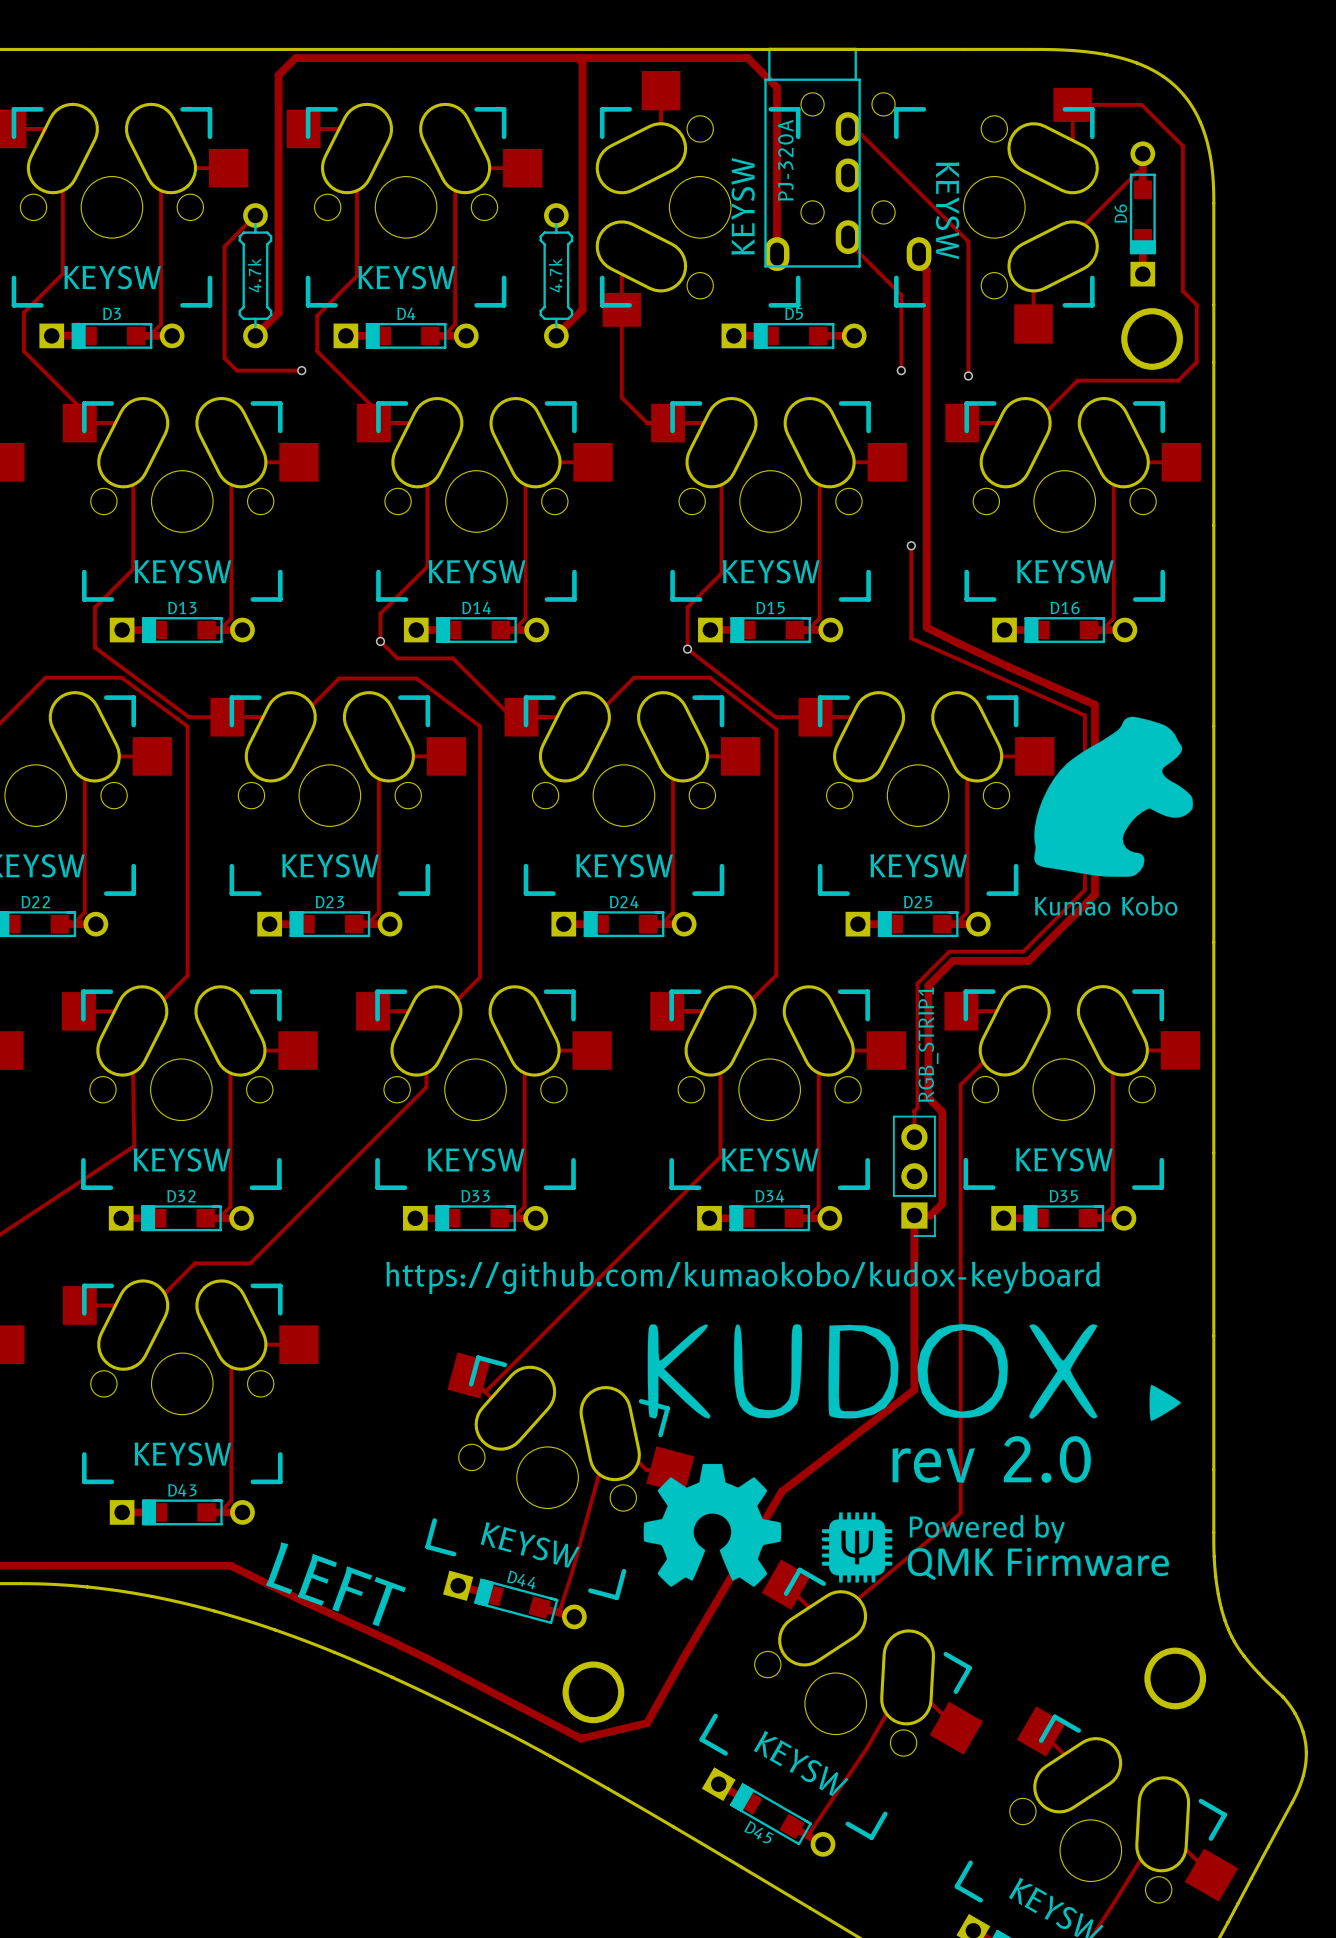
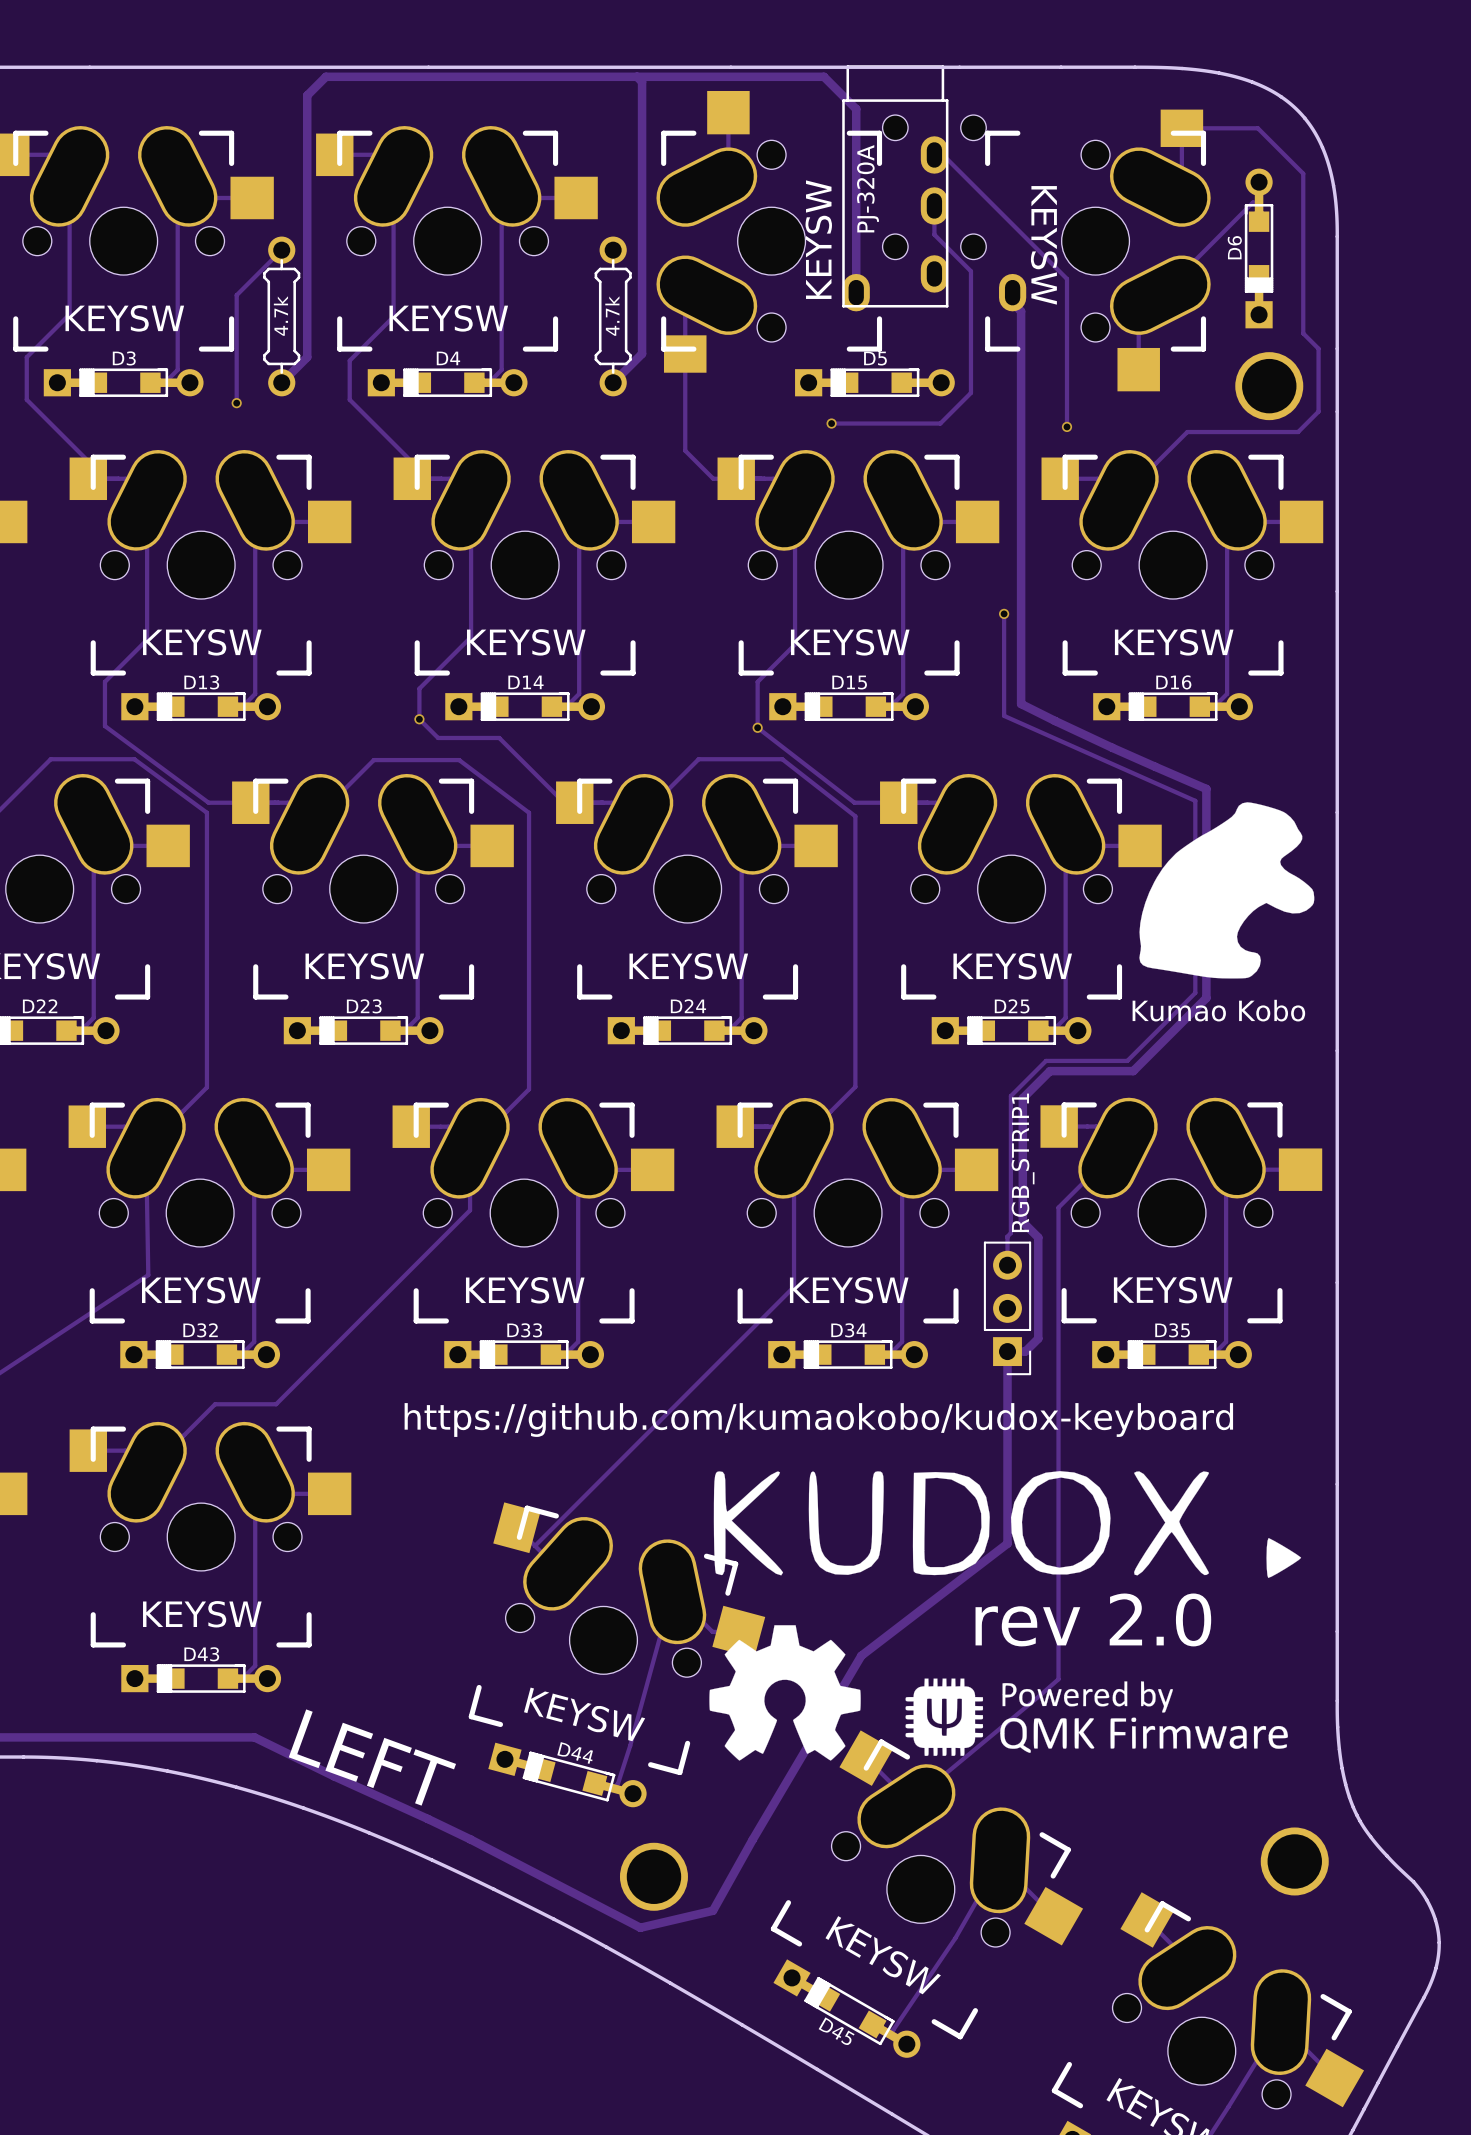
track: none -> (934, 205) (934, 234) (970, 271) (970, 392) (940, 423) (831, 423)
track: (848, 241) (901, 294) (901, 370) -> none
track: (224, 246) (224, 358) (236, 370) (301, 370) -> (247, 284) (236, 295) (236, 403)
via position: (301, 370) -> (236, 403)
via: (901, 370) -> none
via: none -> (831, 423)

